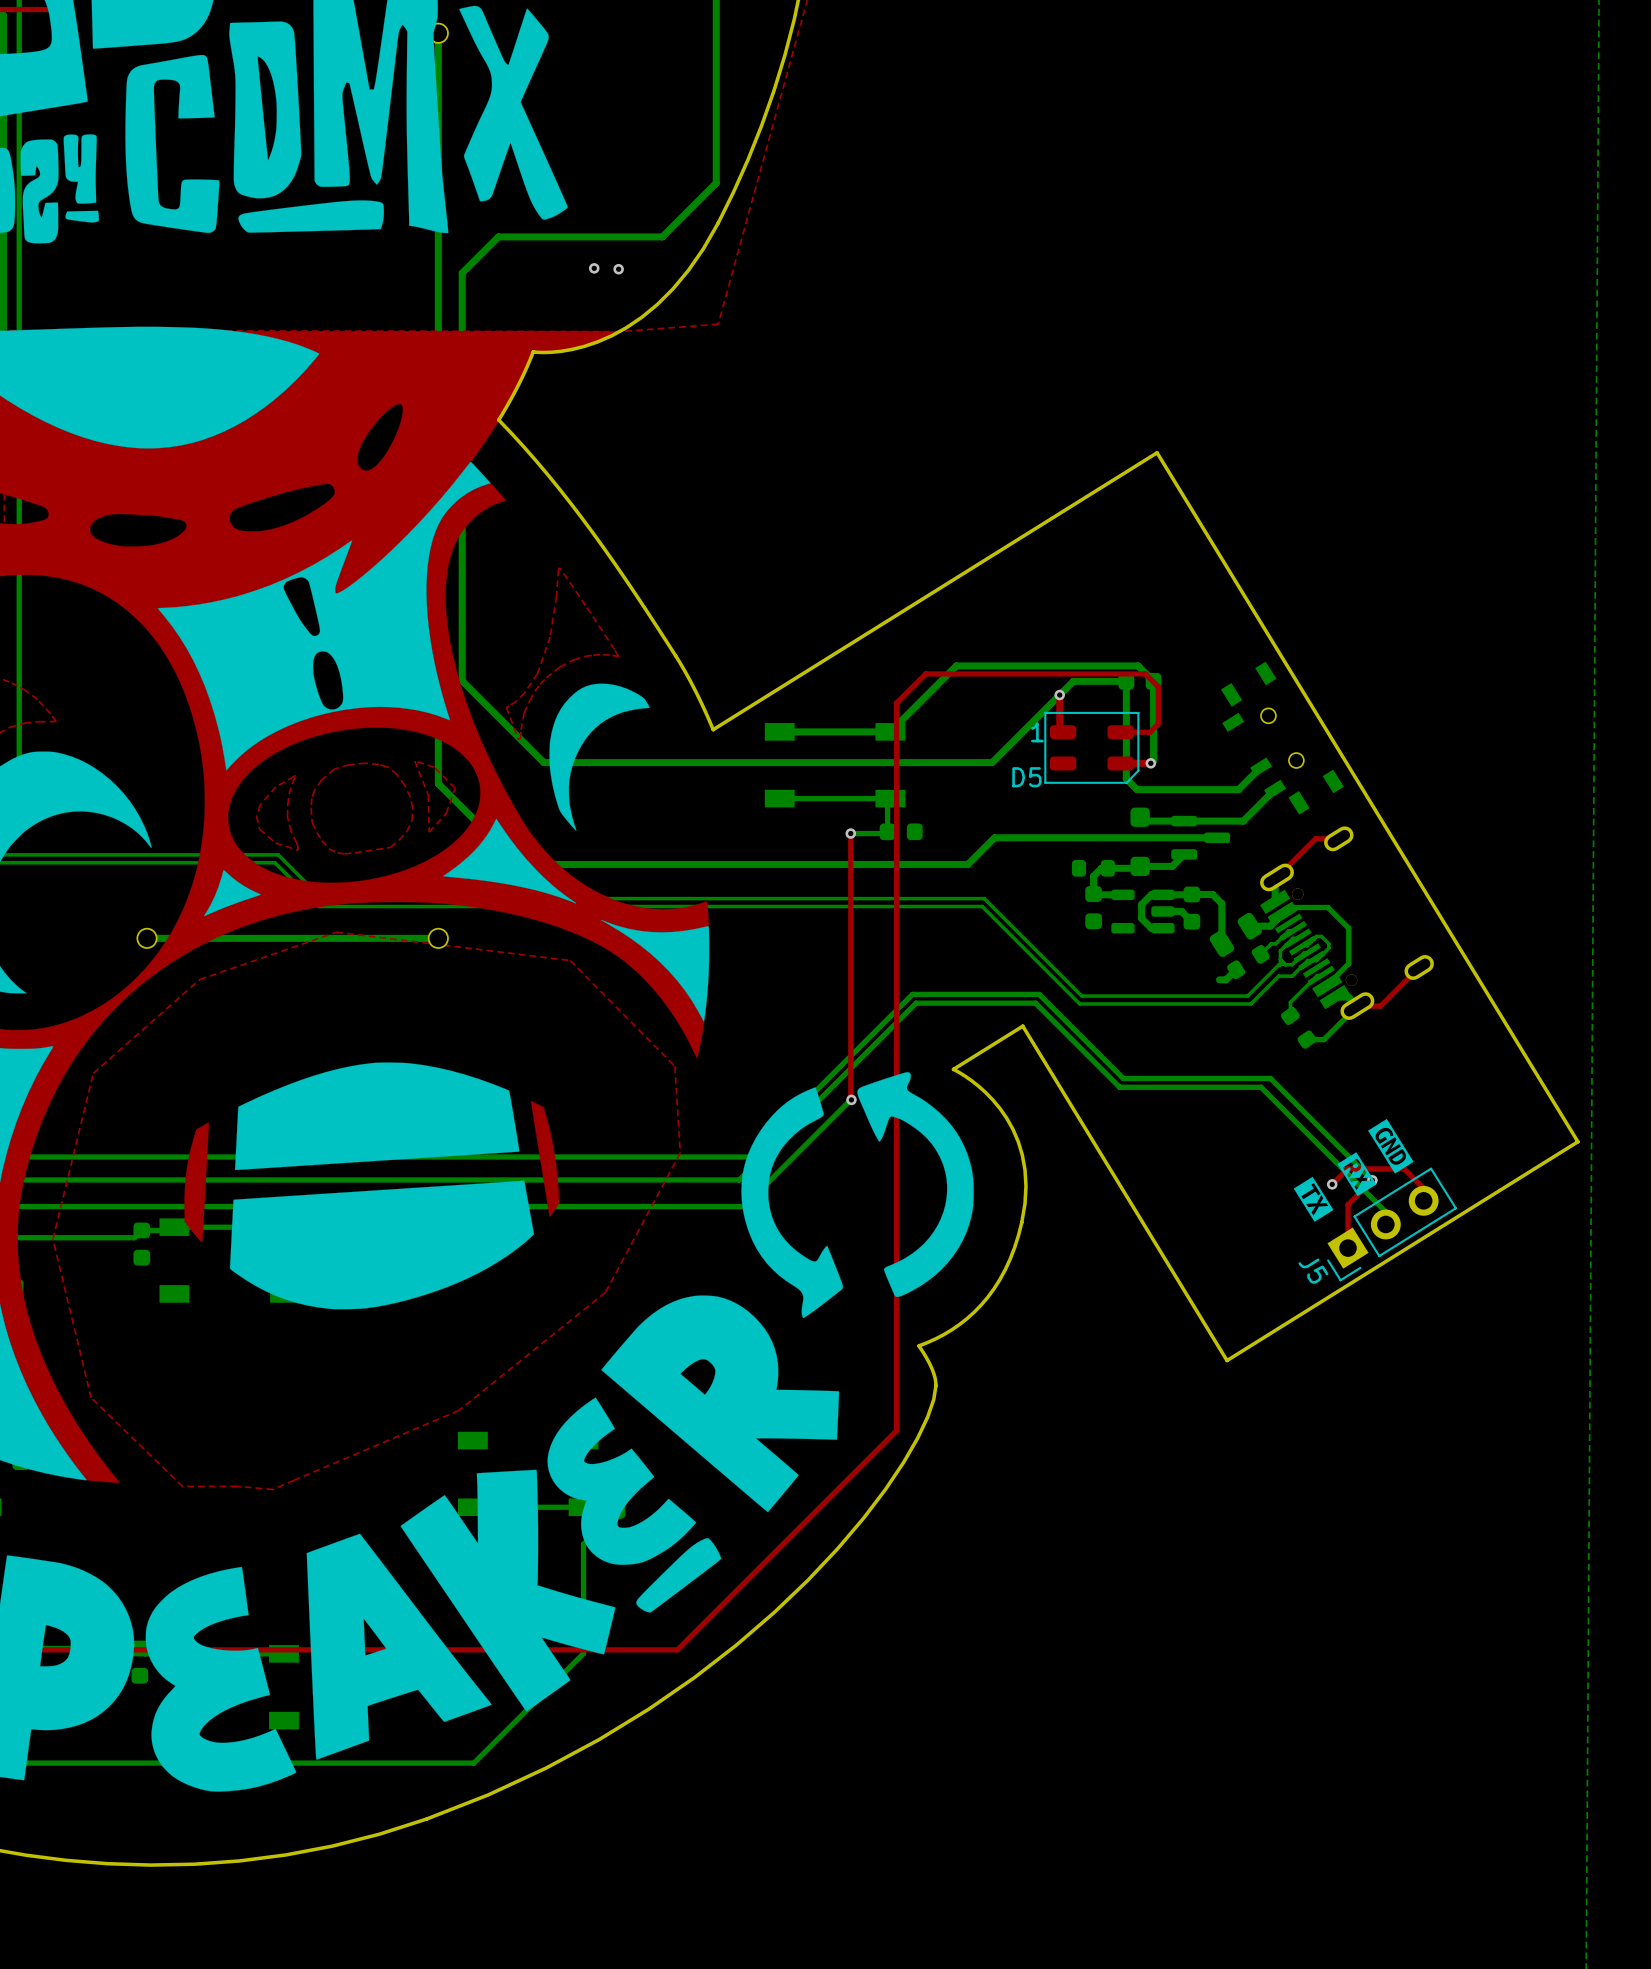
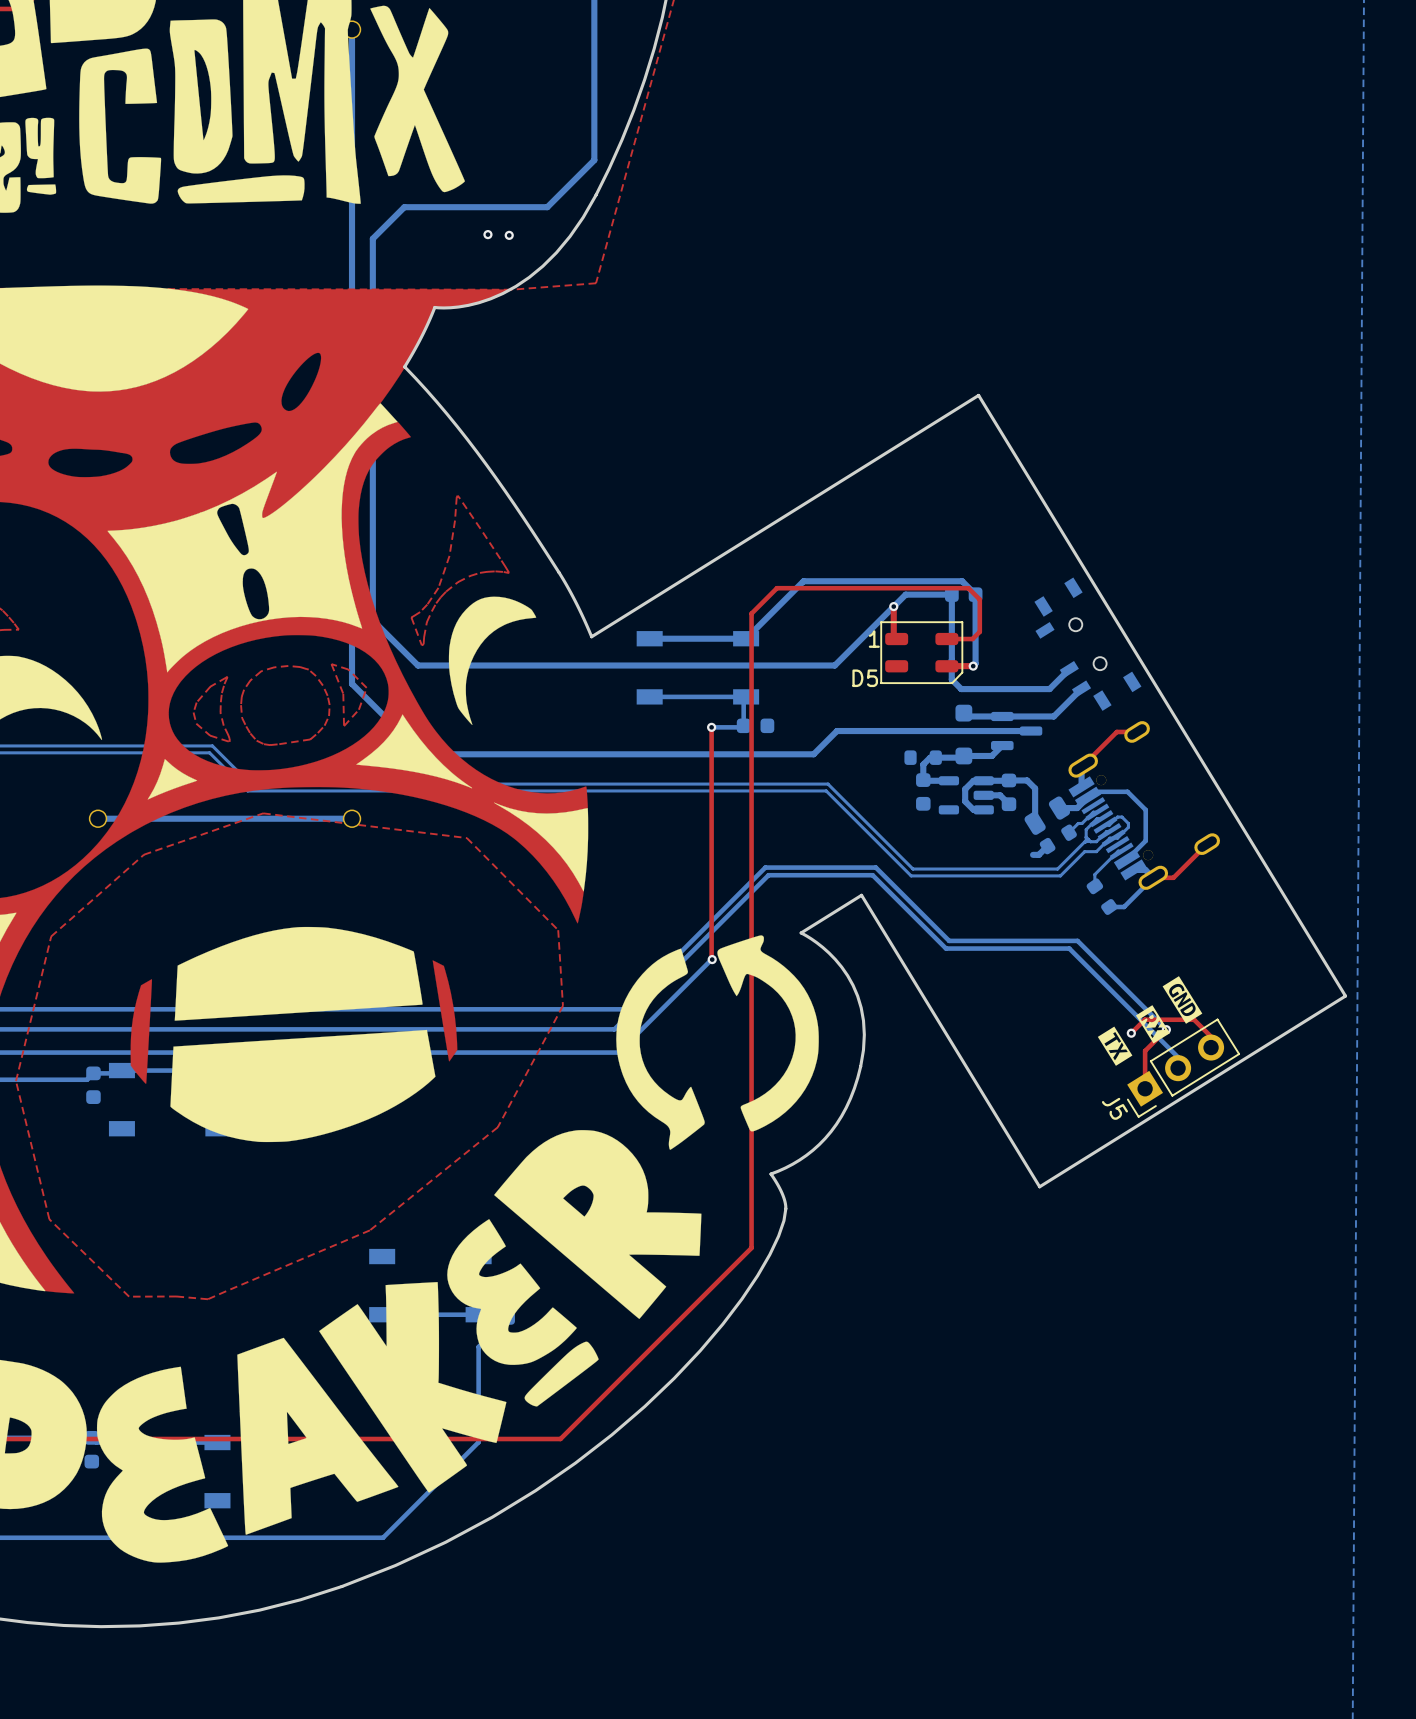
bottom track: (462, 680) (543, 762) -> (372, 594) (372, 620) (418, 665) (444, 665)

